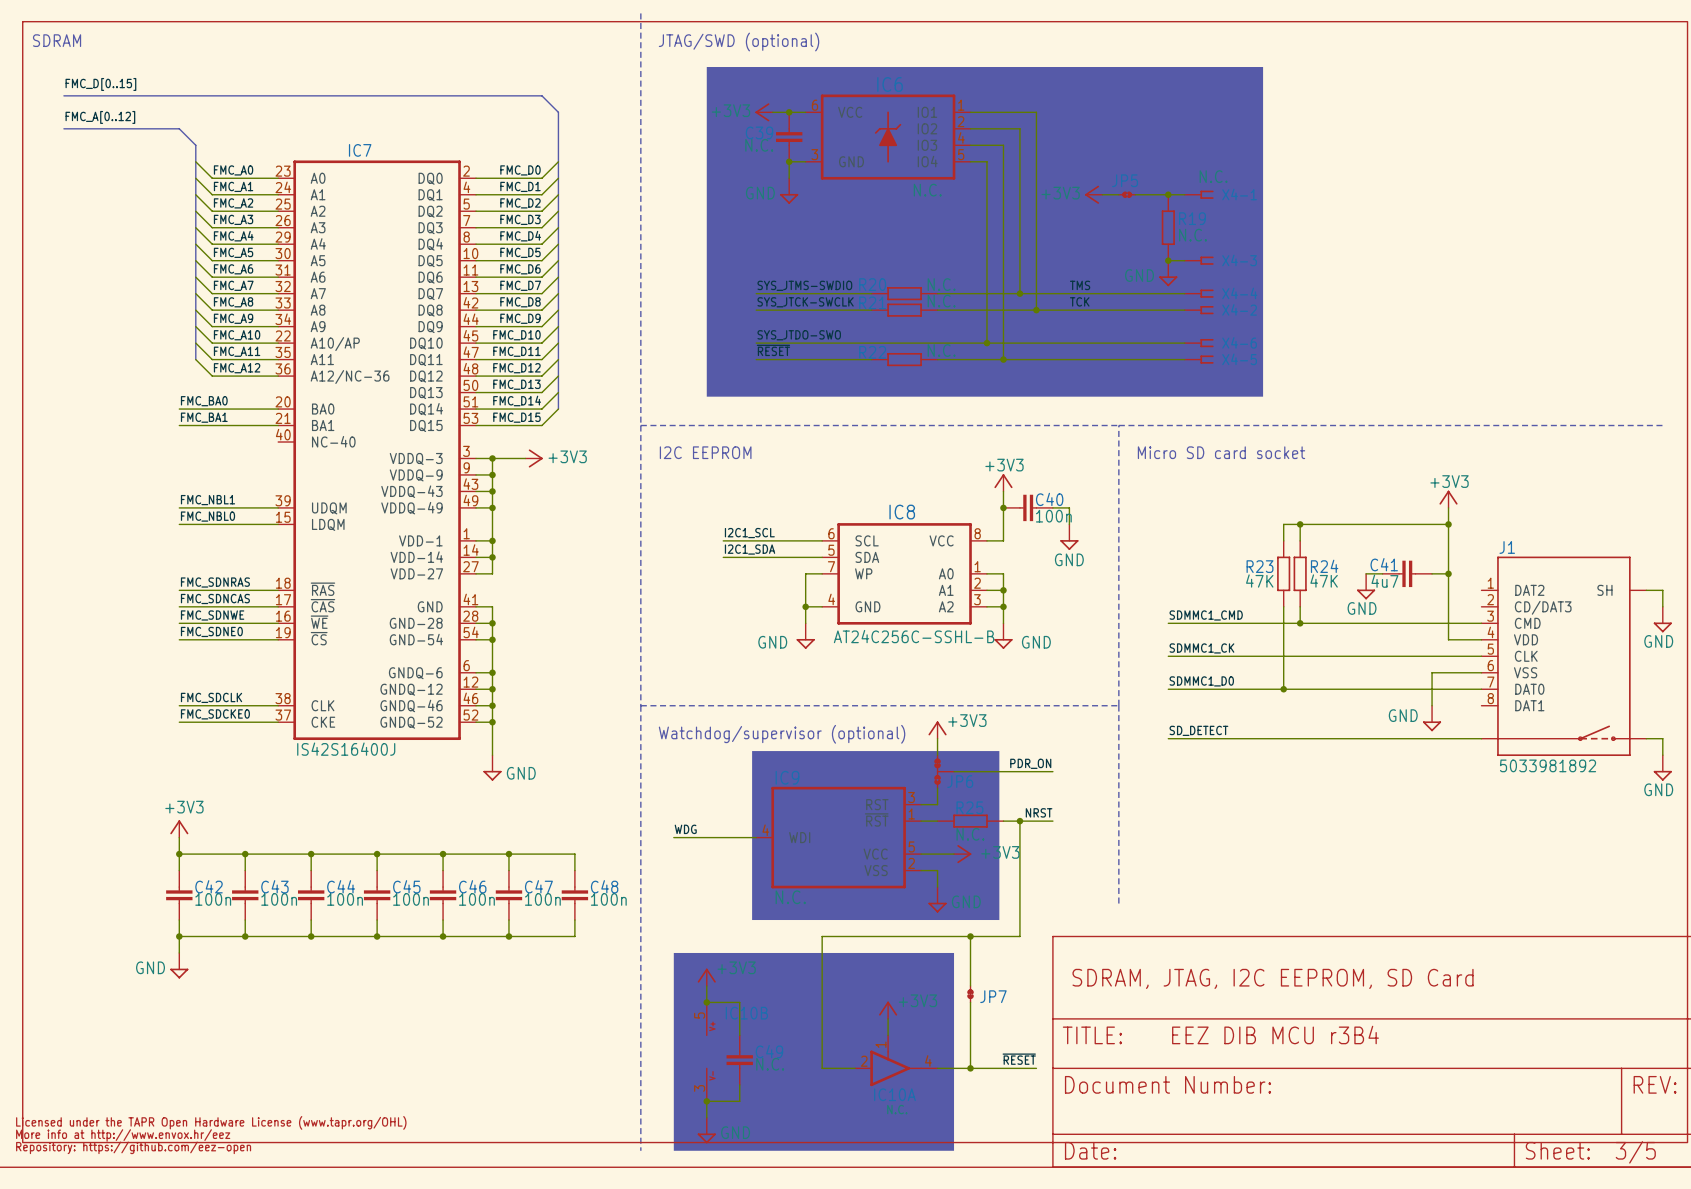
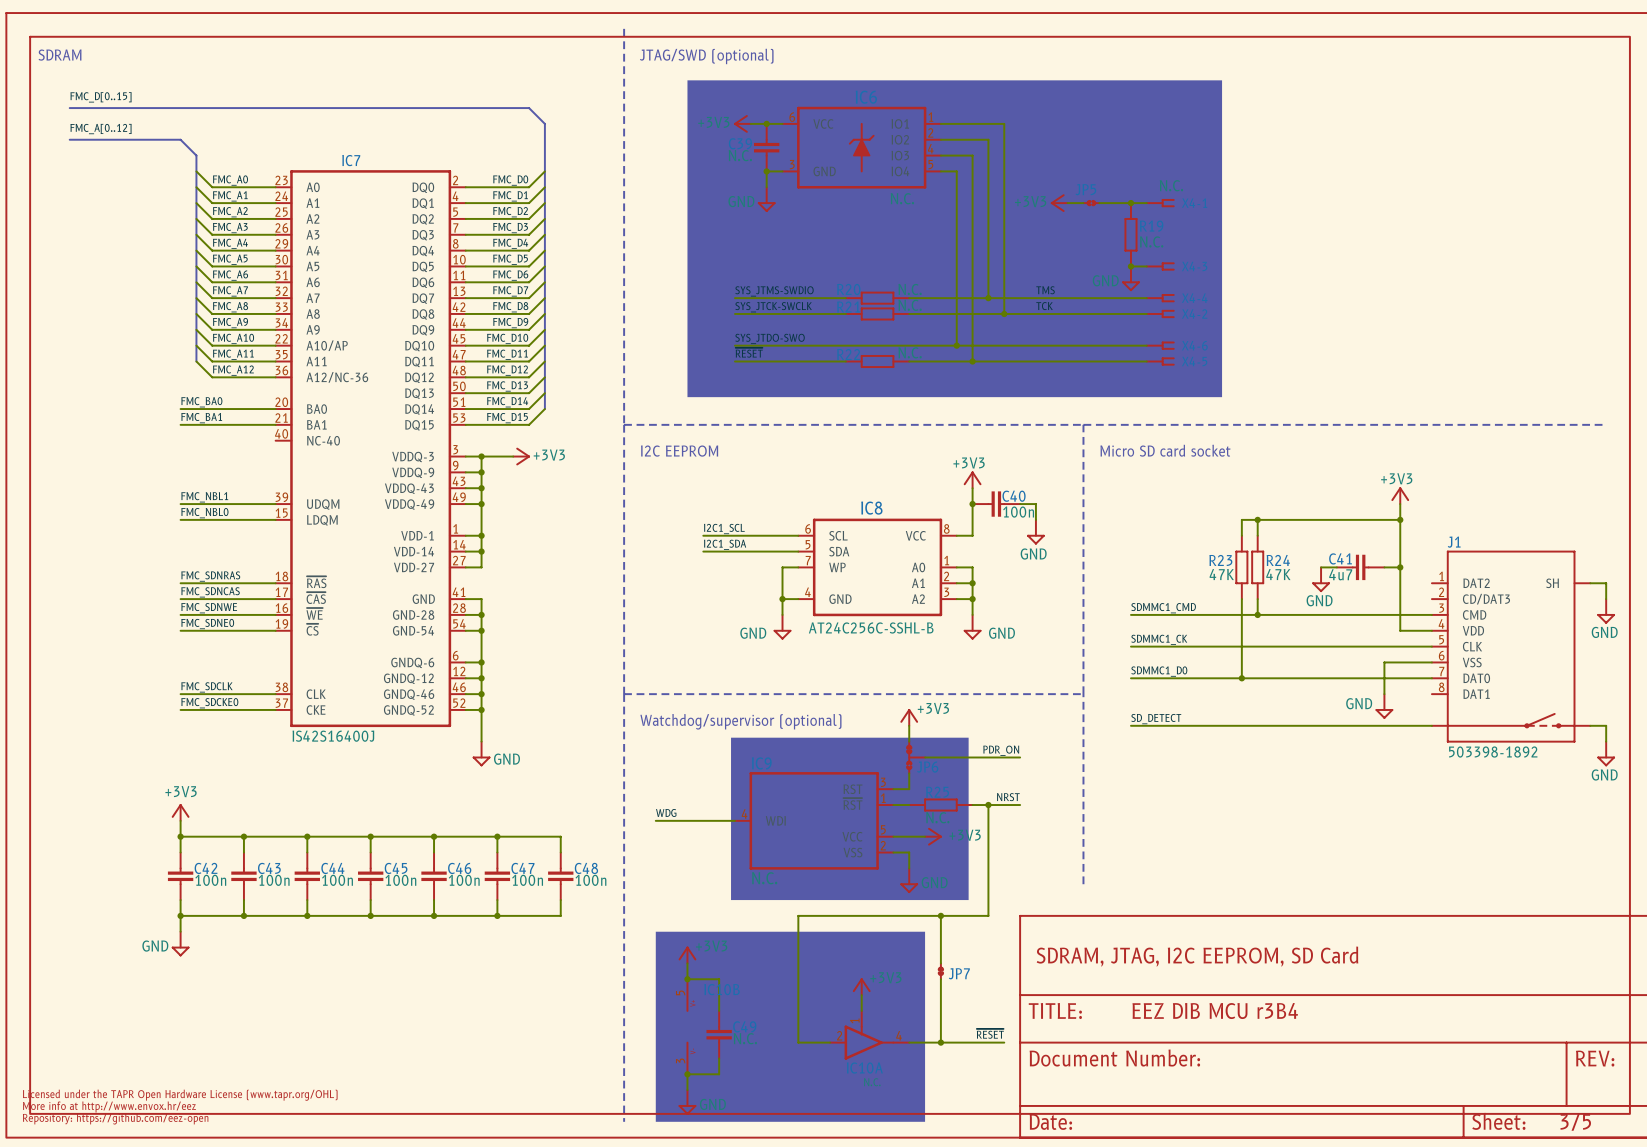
J1 value: 5033981892 (1548, 765) -> 503398-1892 (1493, 752)

